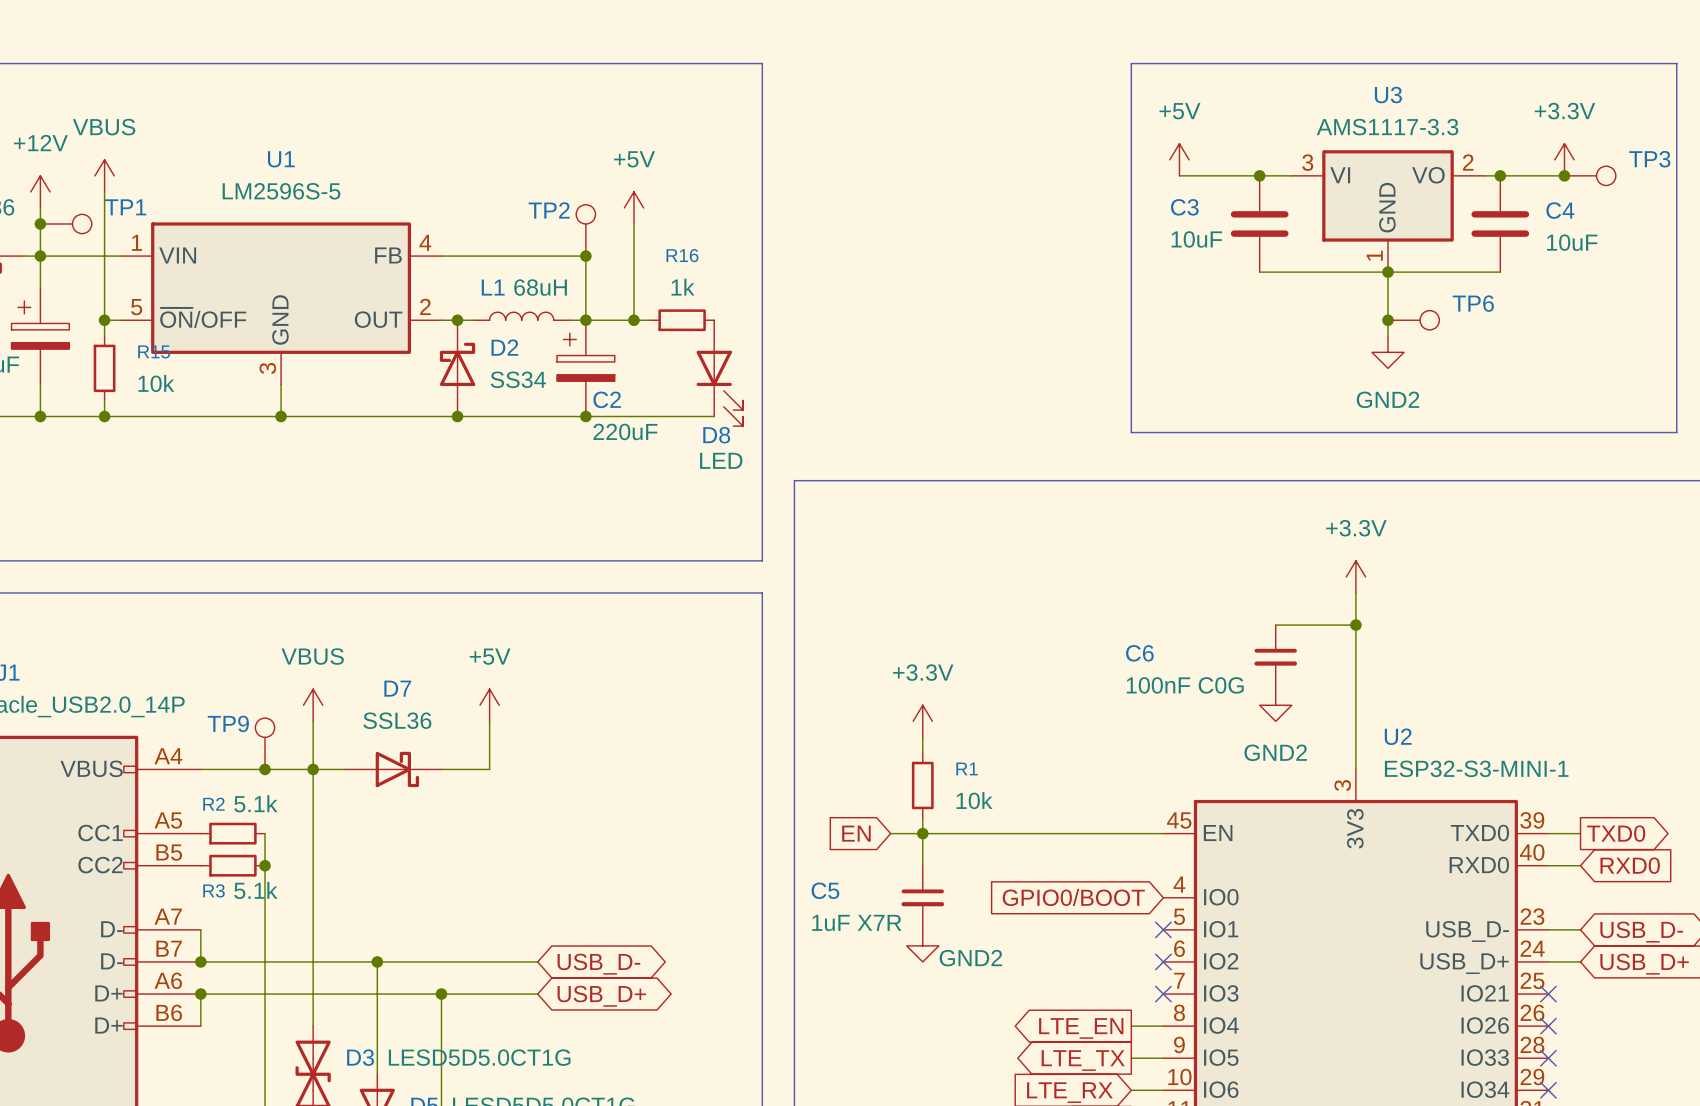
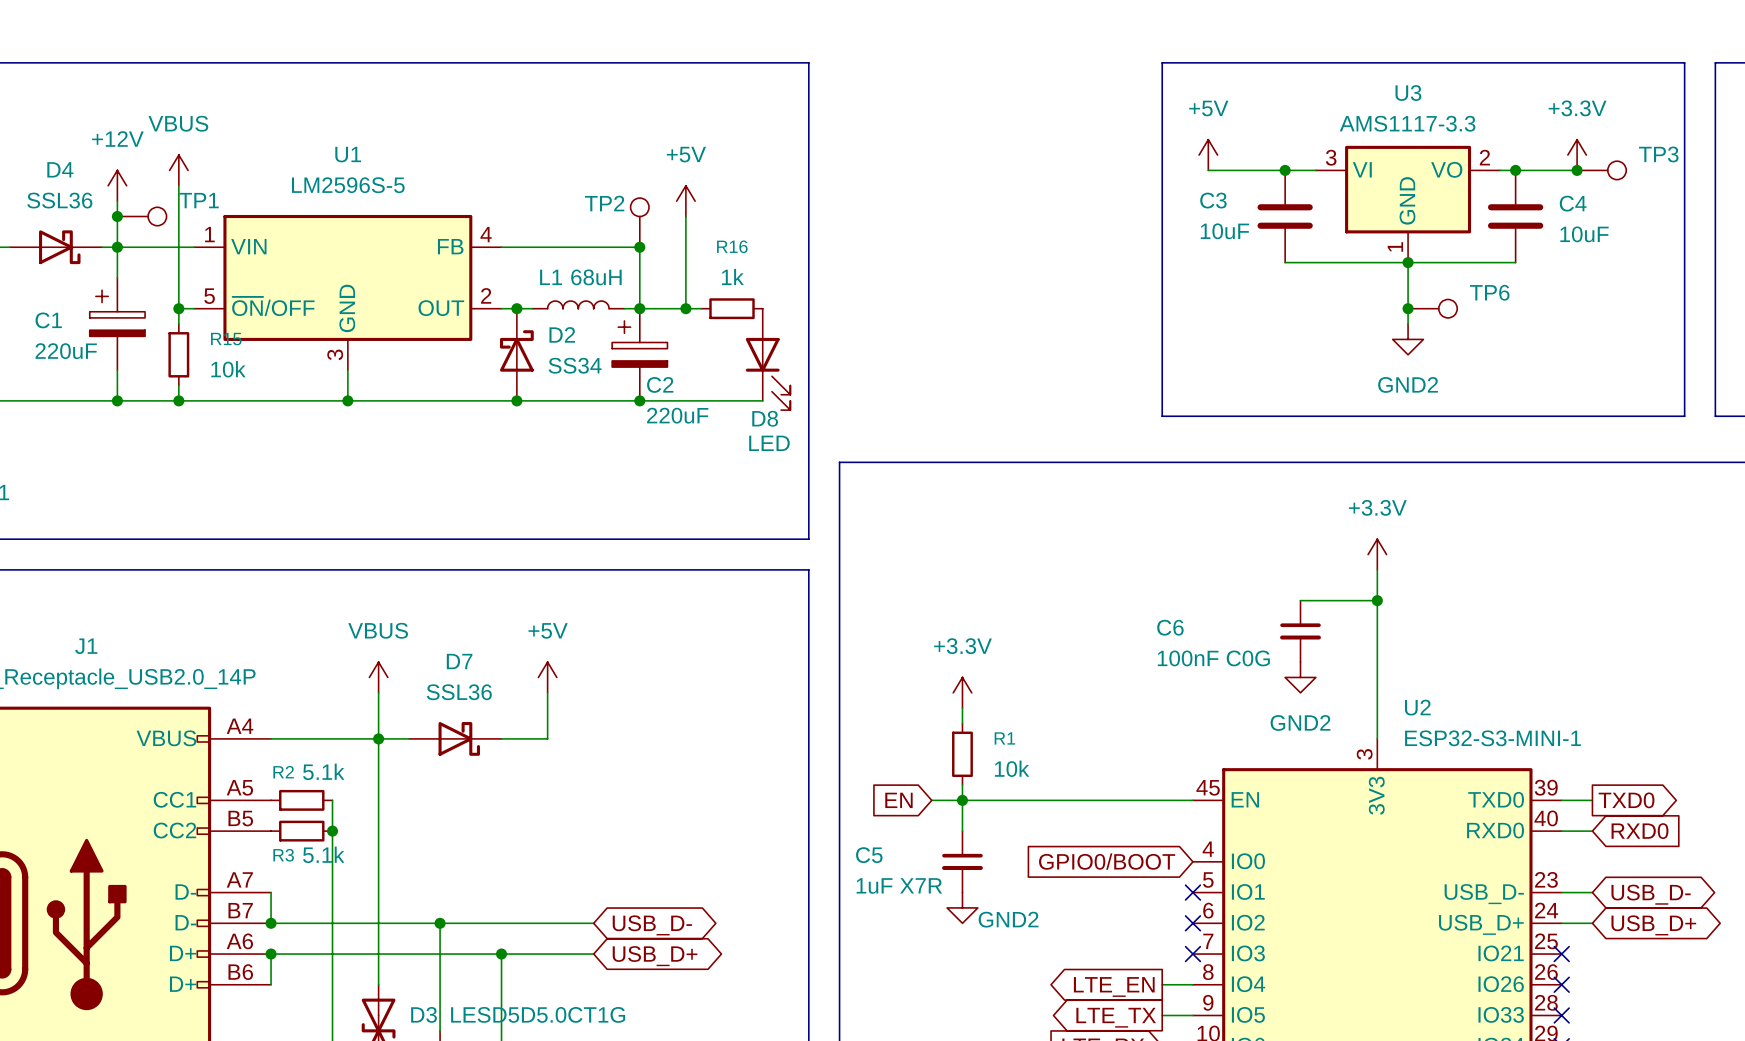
TP9: (265, 743) -> none
junction: (265, 769) -> none

